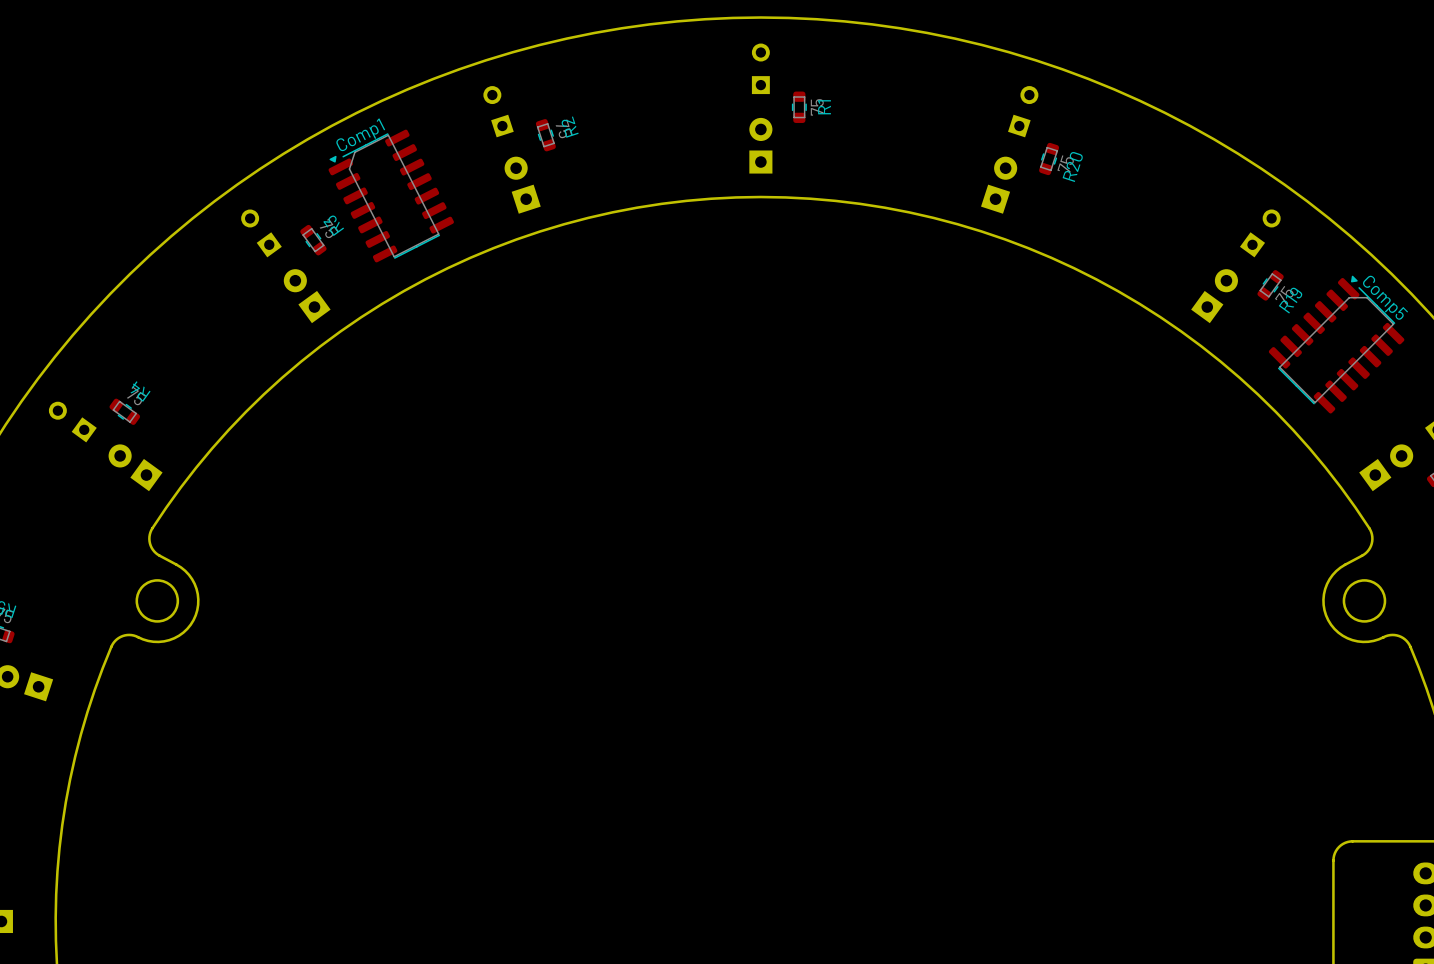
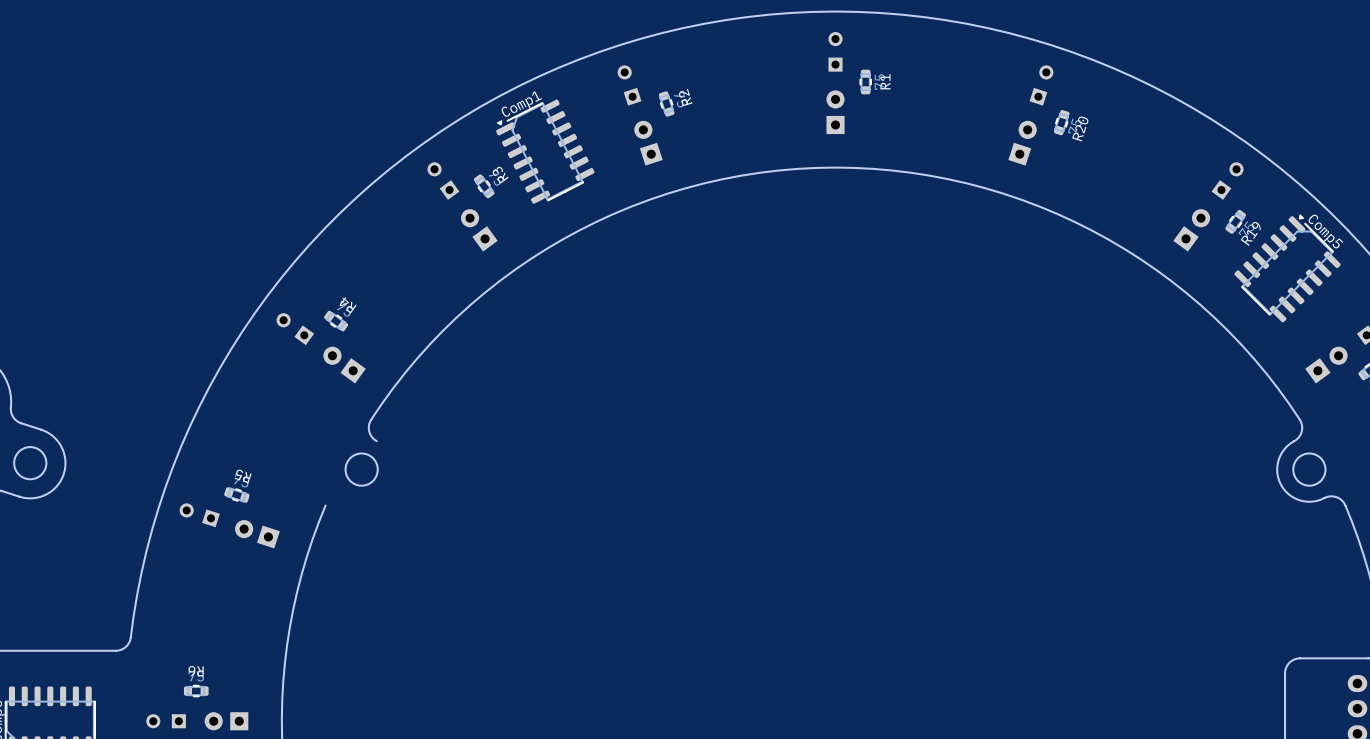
board edge: (1345, 564) (1367, 551) (1371, 543) (1371, 534) (1355, 507) (1325, 467) (1275, 411) (1220, 361) (1160, 317) (1118, 291) (1074, 268) (1028, 248) (981, 231) (933, 217) (860, 203) (810, 198) (760, 197) (711, 198) (661, 203) (588, 217) (540, 231) (493, 248) (447, 268) (403, 291) (361, 317) (320, 346) (282, 377) (228, 429) (180, 487) (151, 530) (149, 541) (154, 551) (181, 567) (194, 583) (198, 604) (190, 624) (179, 635) (169, 640) (153, 641) (127, 635) (118, 638) (111, 646) -> (1294, 441) (1301, 431) (1300, 421) (1254, 358) (1200, 305) (1156, 269) (1124, 248) (1057, 213) (985, 188) (911, 172) (835, 167) (759, 172) (685, 188) (614, 213) (546, 248) (515, 269) (470, 305) (416, 358) (370, 421) (369, 433) (376, 441)

